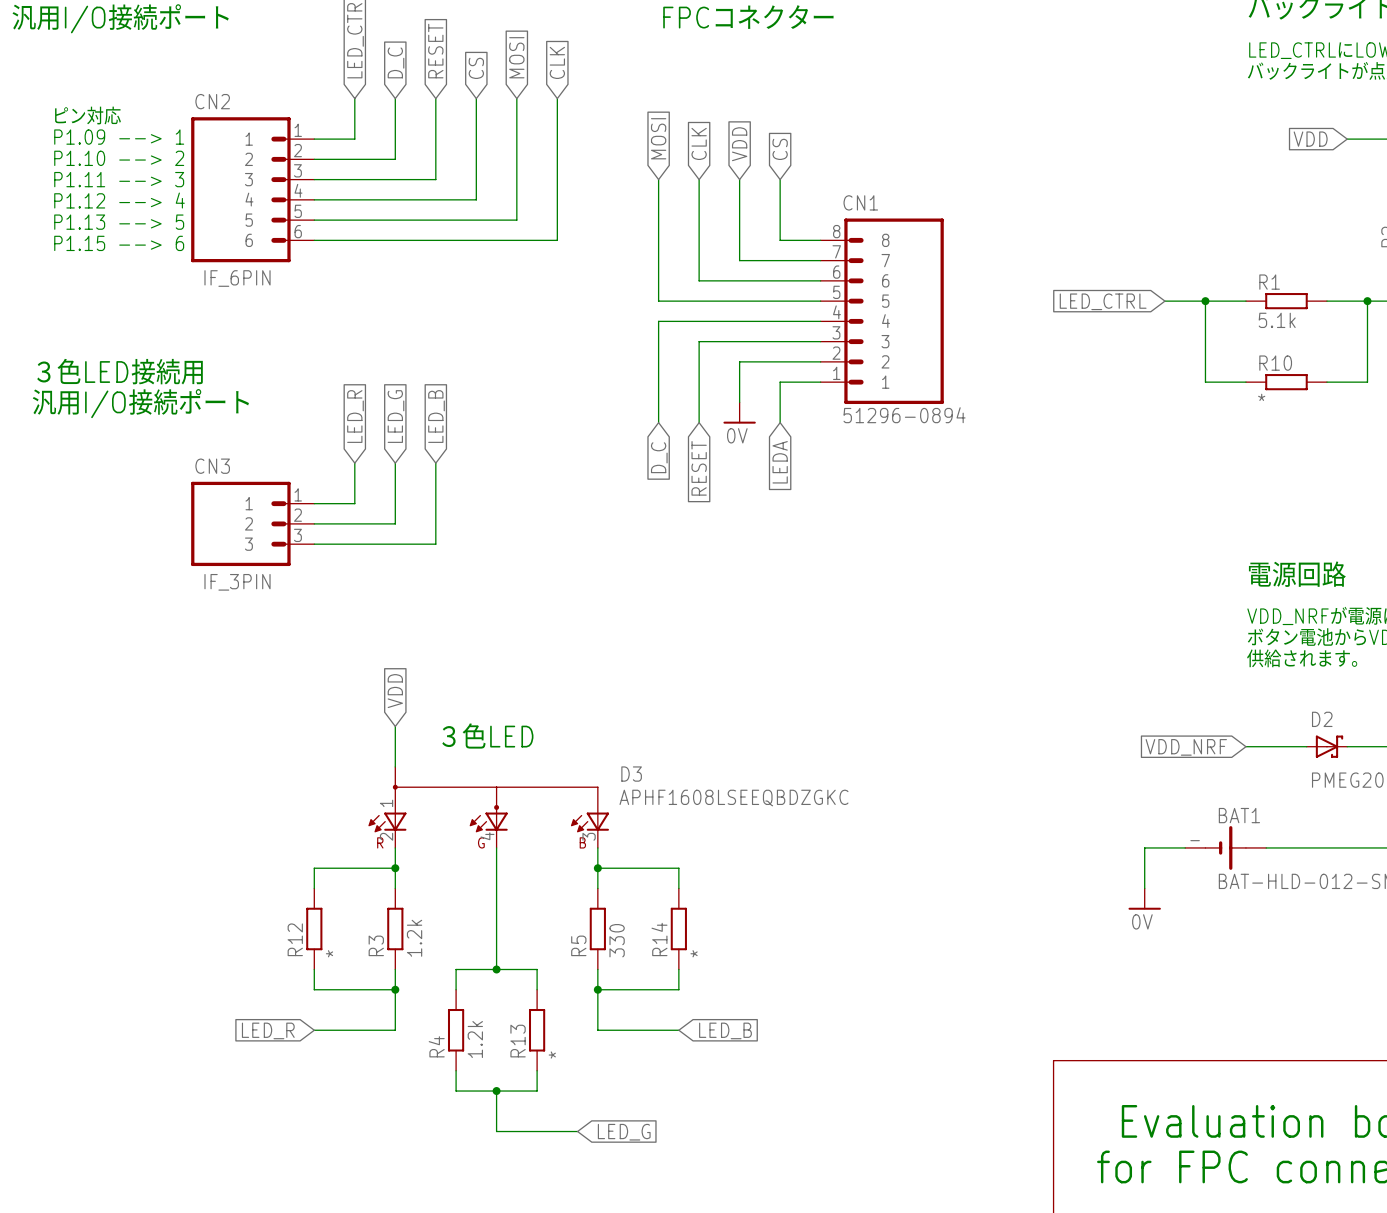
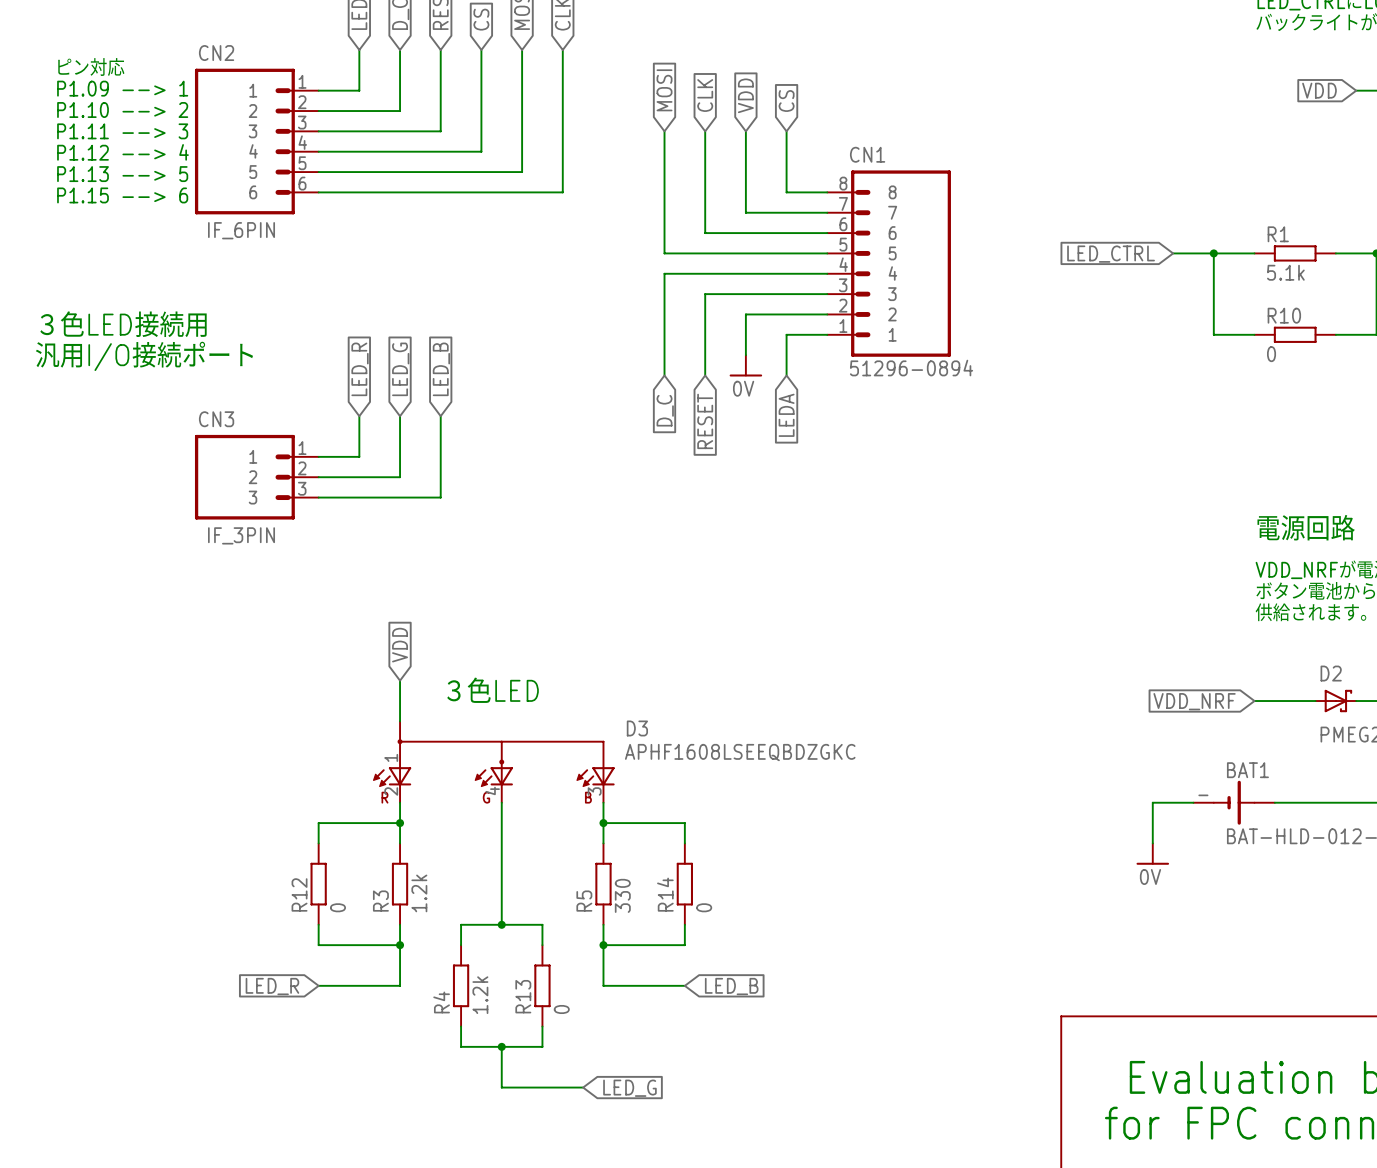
R10 value: * (1261, 397) -> 0 (1271, 354)
R12 value: * (329, 953) -> 0 (337, 907)
R14 value: * (694, 953) -> 0 (704, 907)
R13 value: * (552, 1055) -> 0 (561, 1009)

